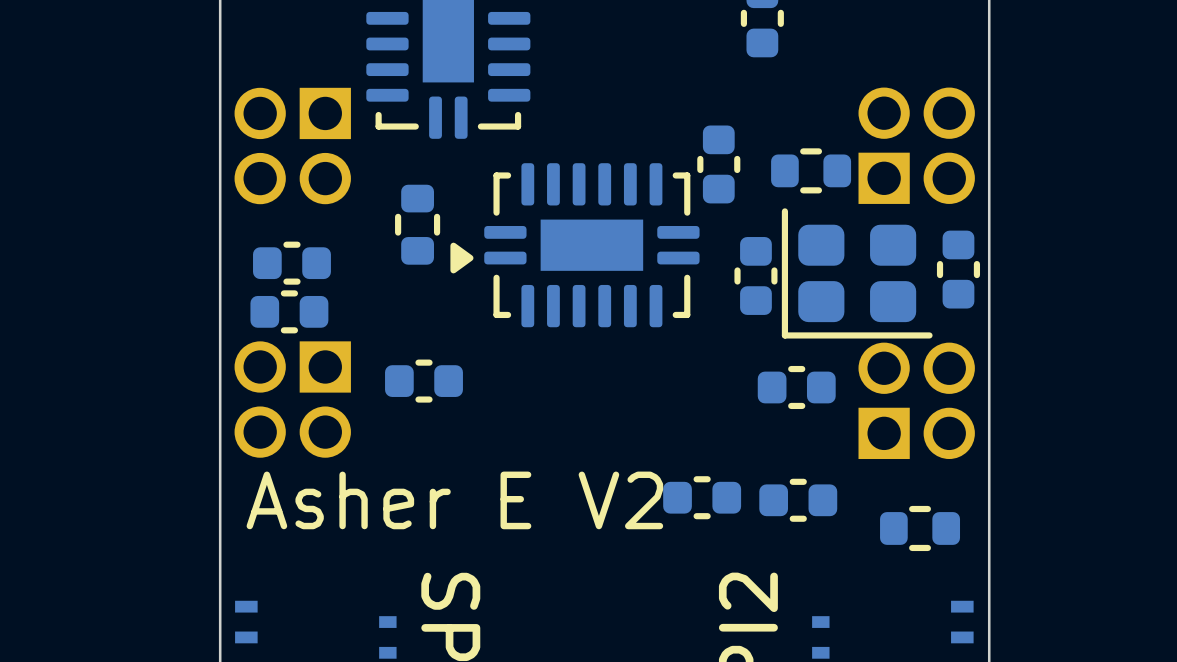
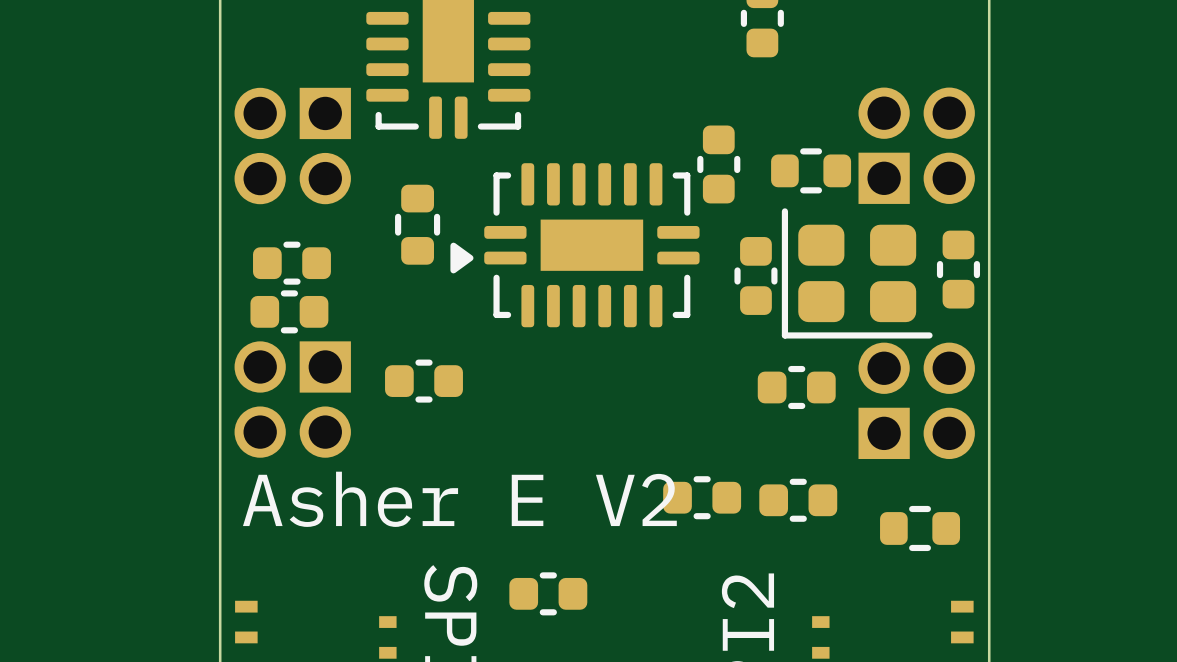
part: none -> (548, 593)

